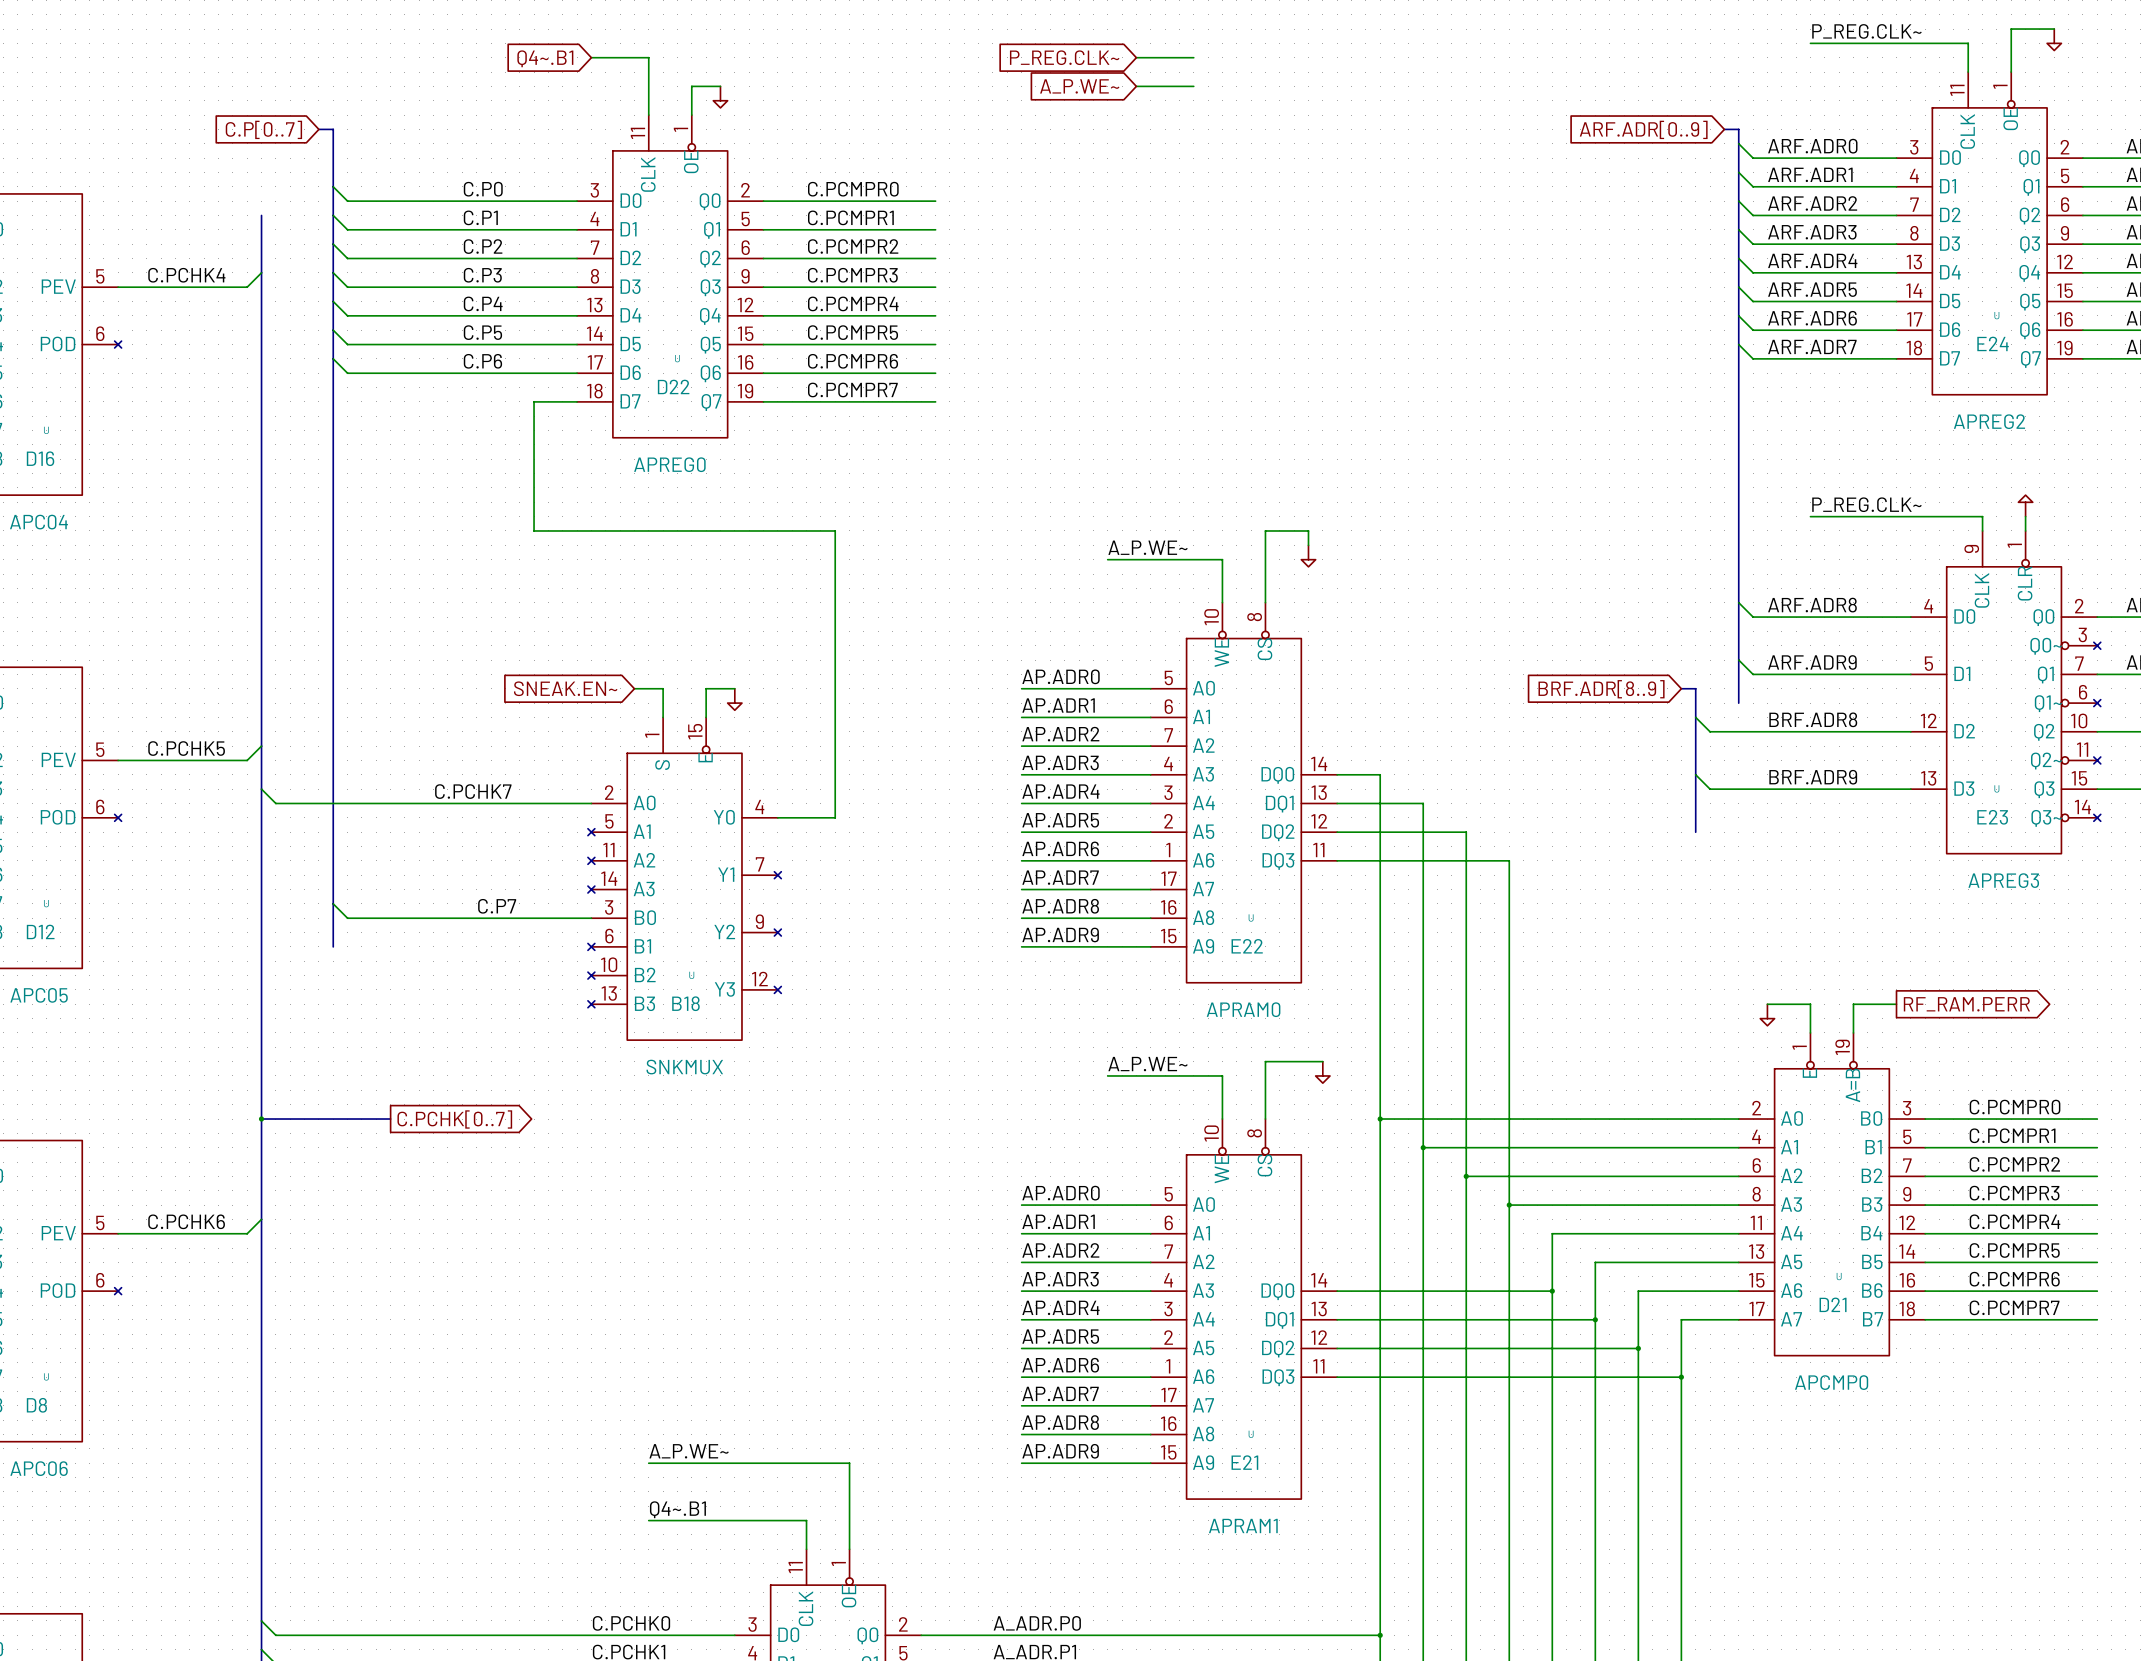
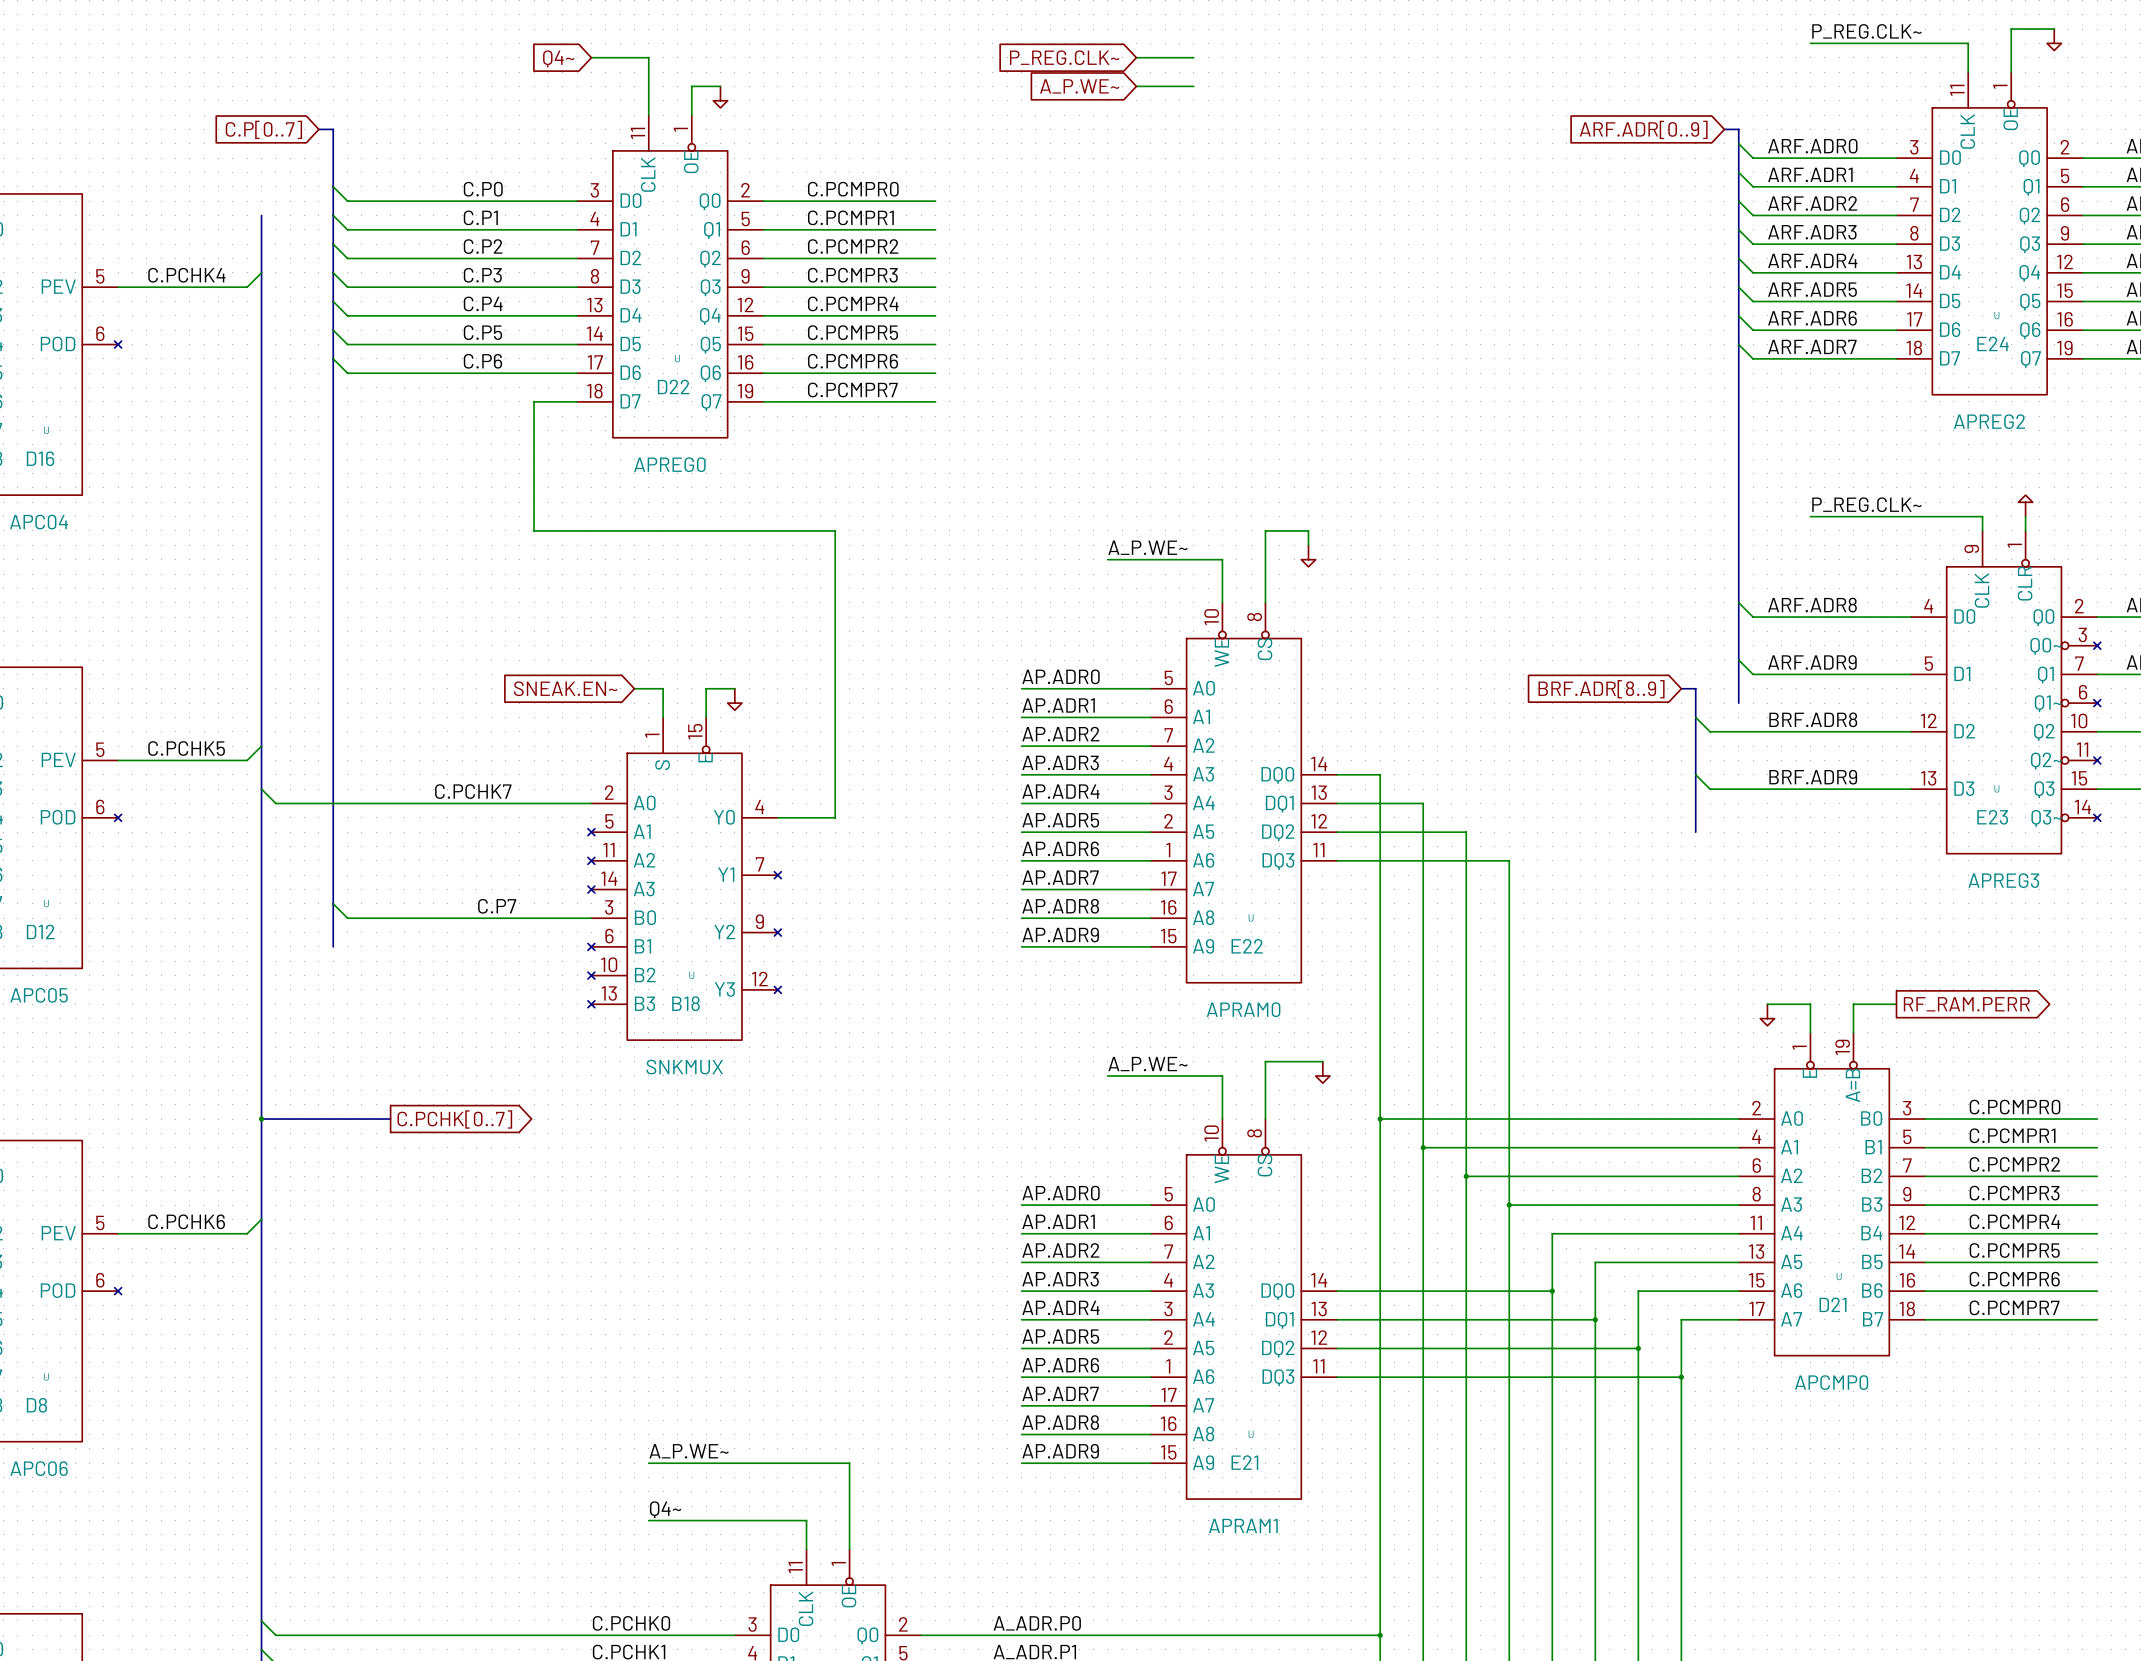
global label: Q4~.B1 (545, 58) -> Q4~ (558, 58)
label: Q4~.B1 (677, 1509) -> Q4~ (665, 1509)

